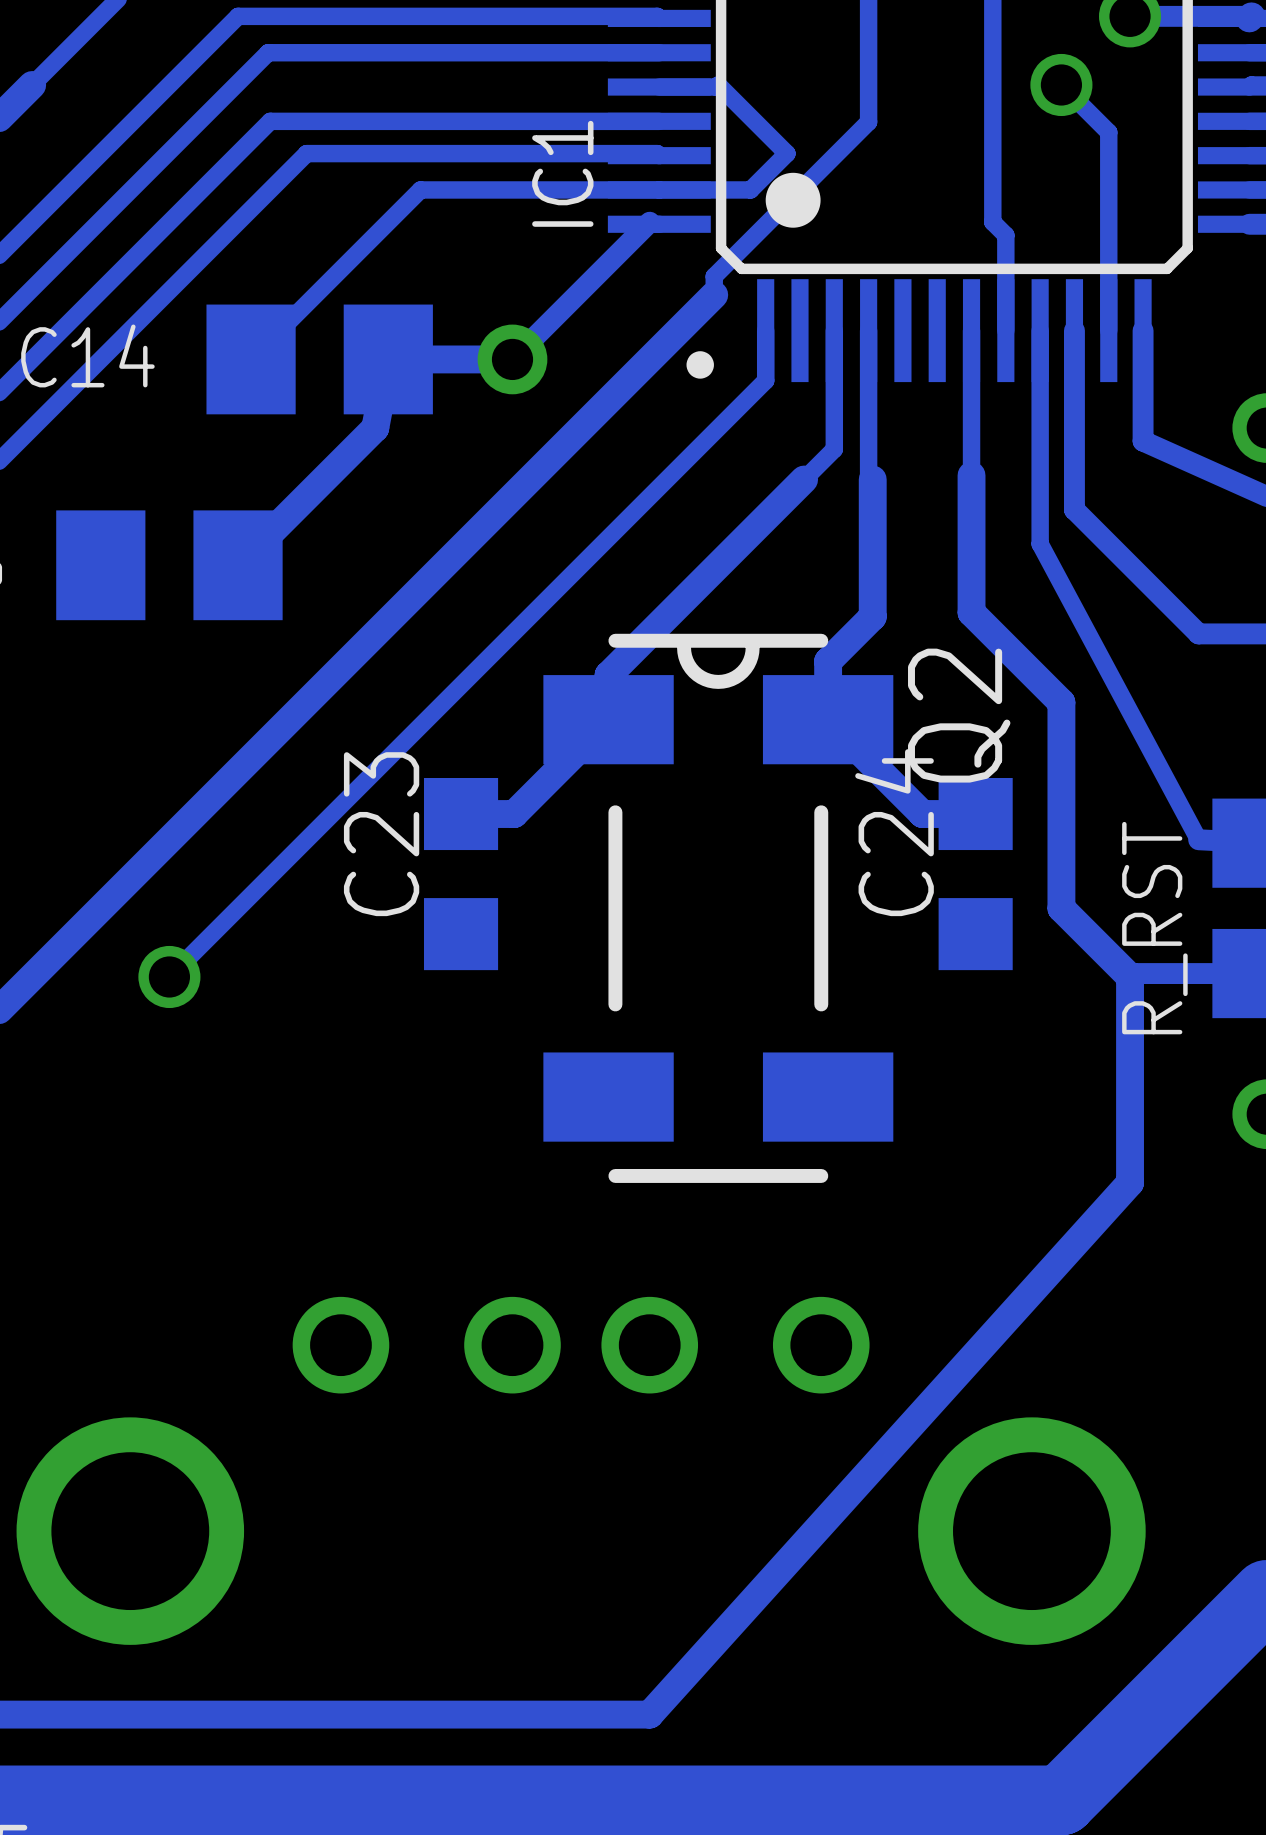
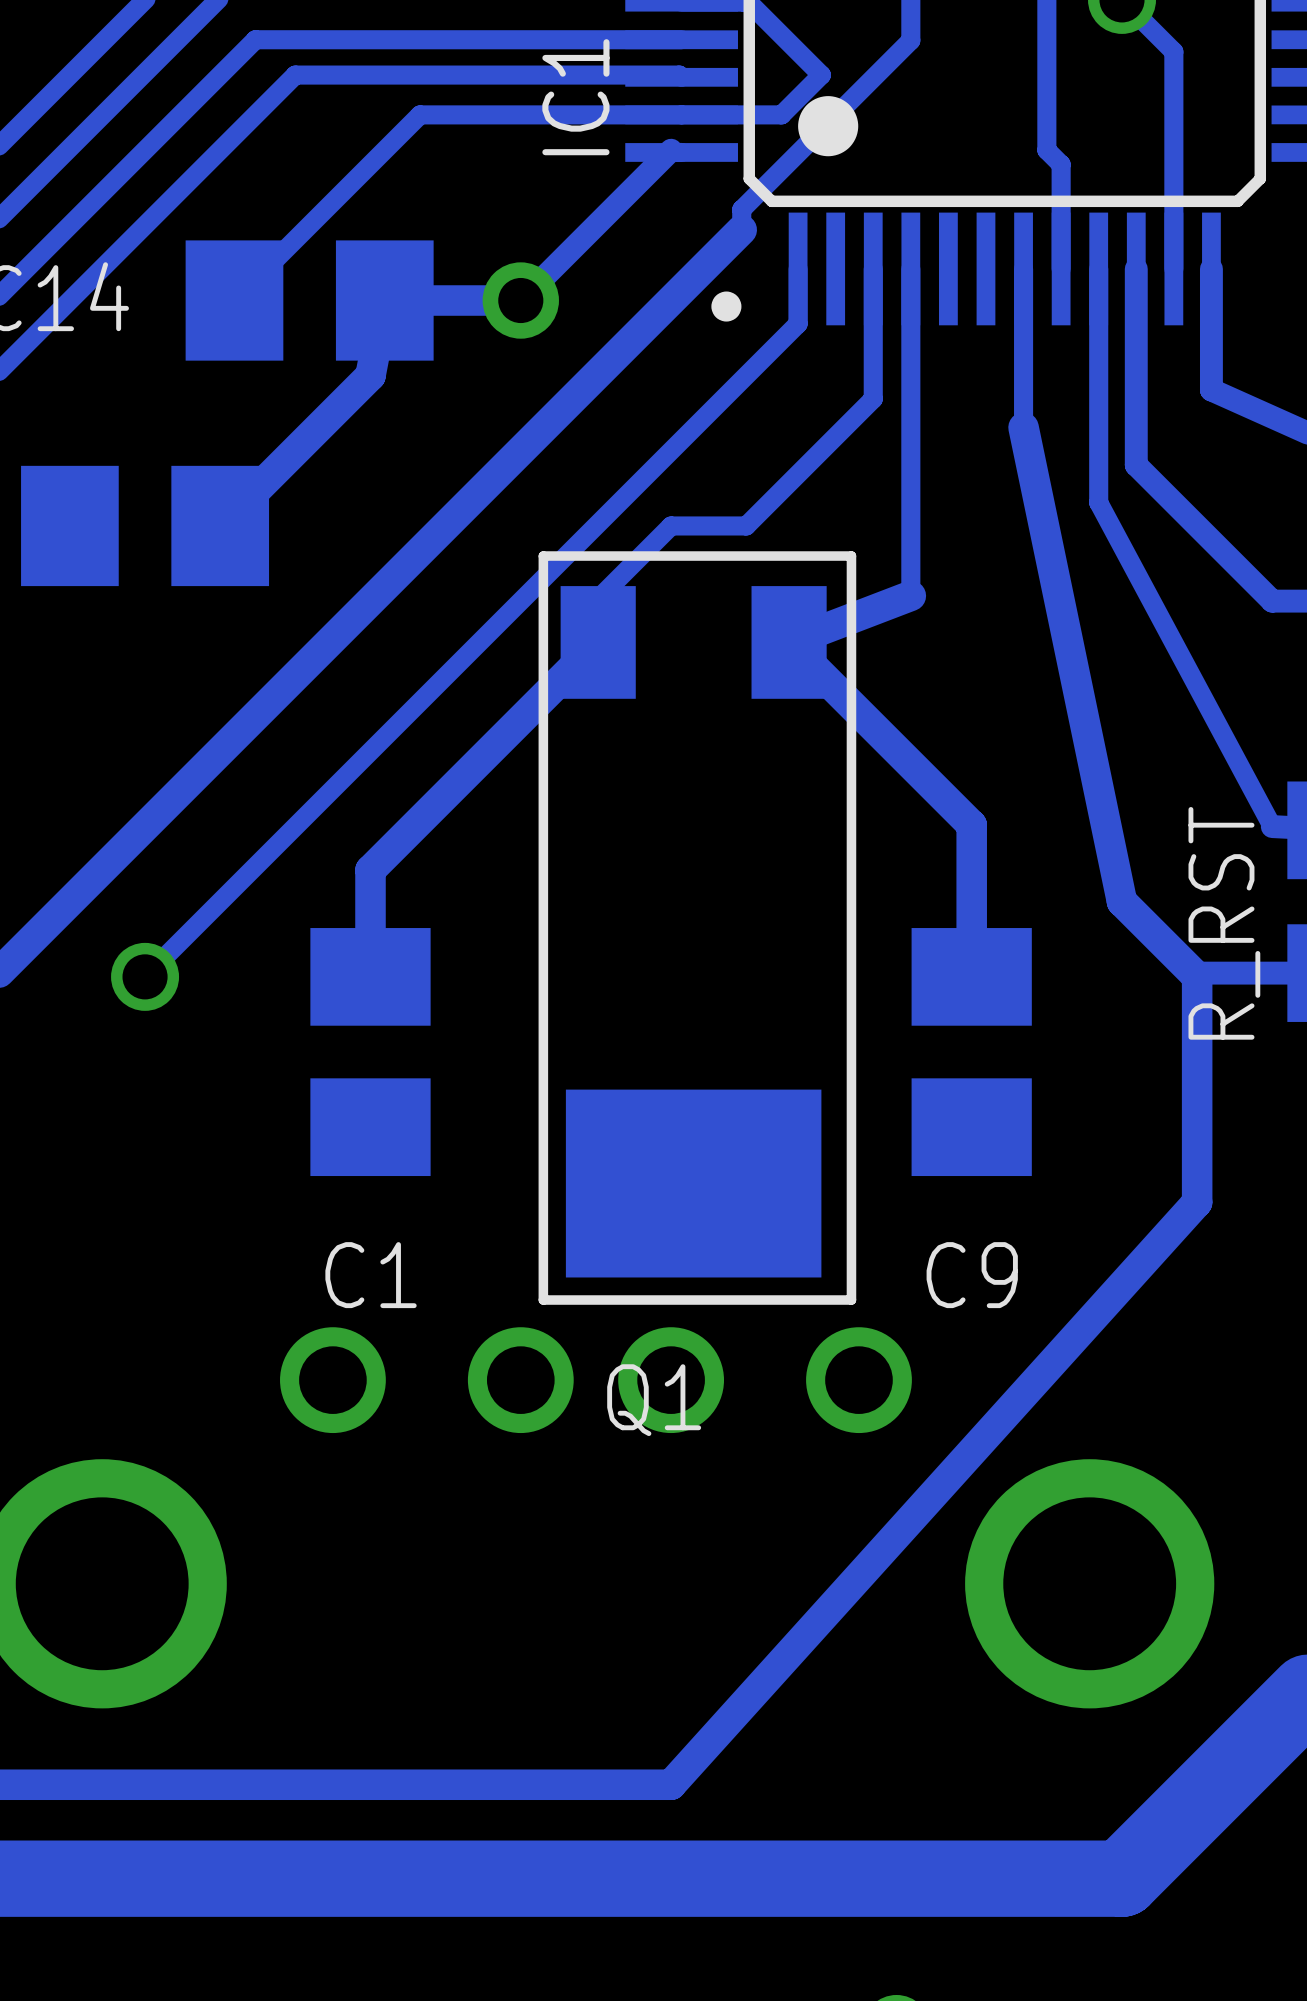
track: (868, 475) (872, 479) (872, 616) (828, 661) (828, 719) (922, 814) (975, 814) -> (910, 427) (910, 595) (789, 642) (971, 825) (971, 976)
track: (971, 475) (971, 612) (1061, 702) (1061, 908) -> (1023, 427) (1122, 901)
track width: thick (804, 479) (718, 565) -> thin (840, 432) (746, 525)
track: (718, 565) (608, 675) (608, 719) (514, 814) (461, 814) -> (746, 525) (671, 525) (595, 601) (595, 640) (598, 642) (370, 870) (370, 976)
C23: (461, 874) -> none
C24: (975, 874) -> none
Q2: (718, 908) -> none
Q1: none -> (697, 928)
C1: none -> (370, 1052)
C9: none -> (971, 1052)

